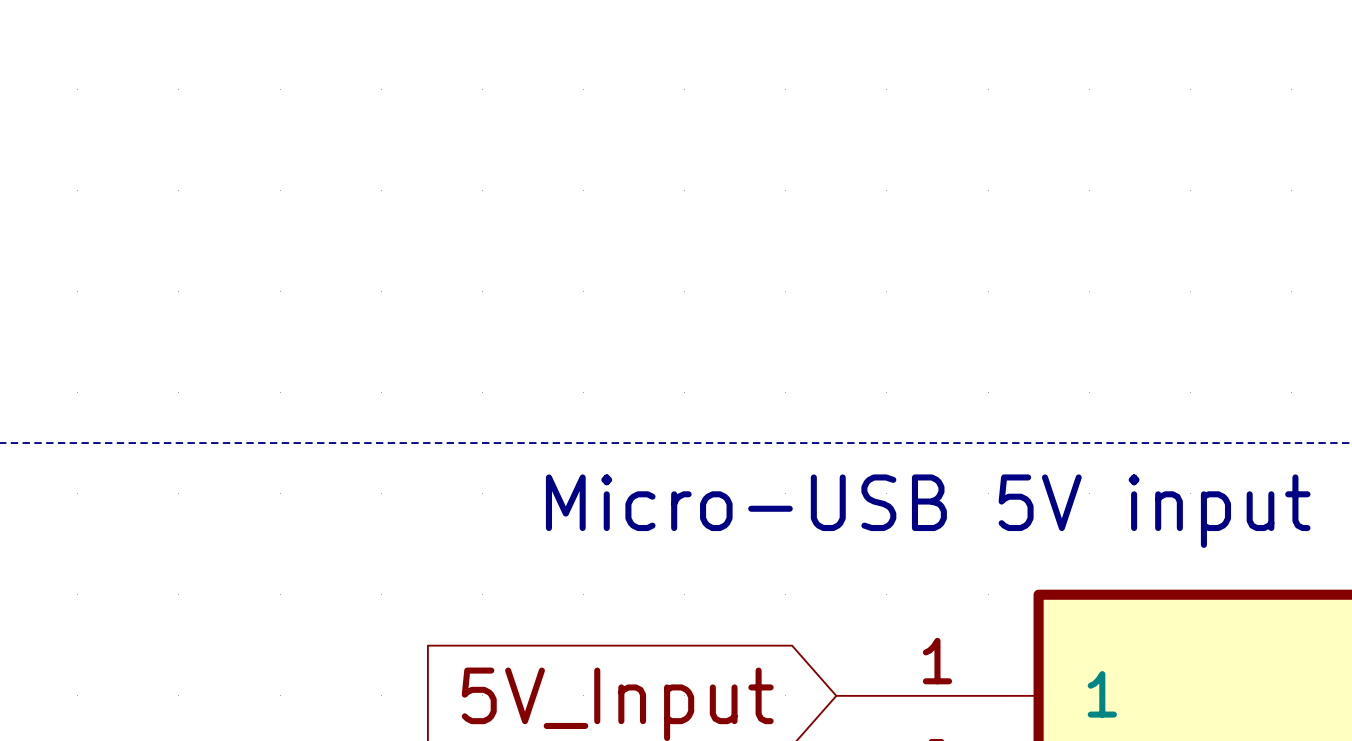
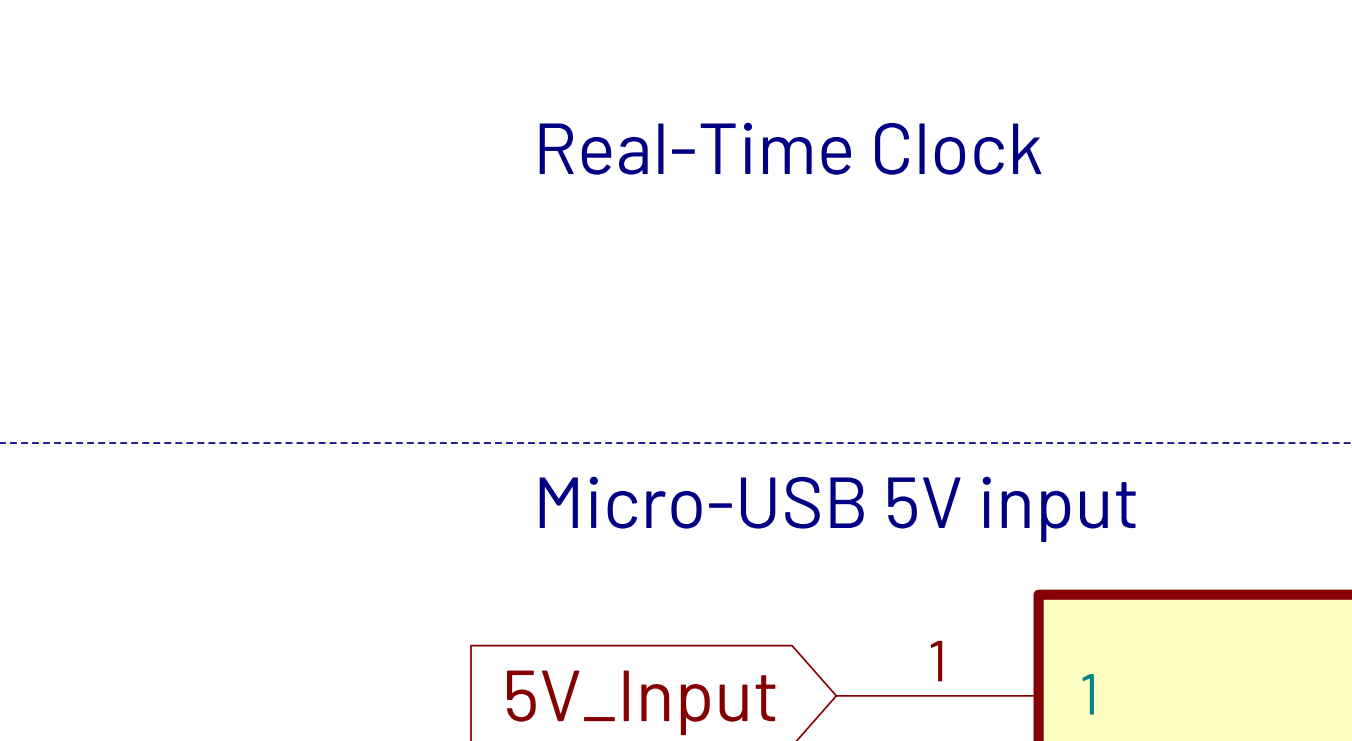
text: none -> Real-Time Clock (790, 148)

